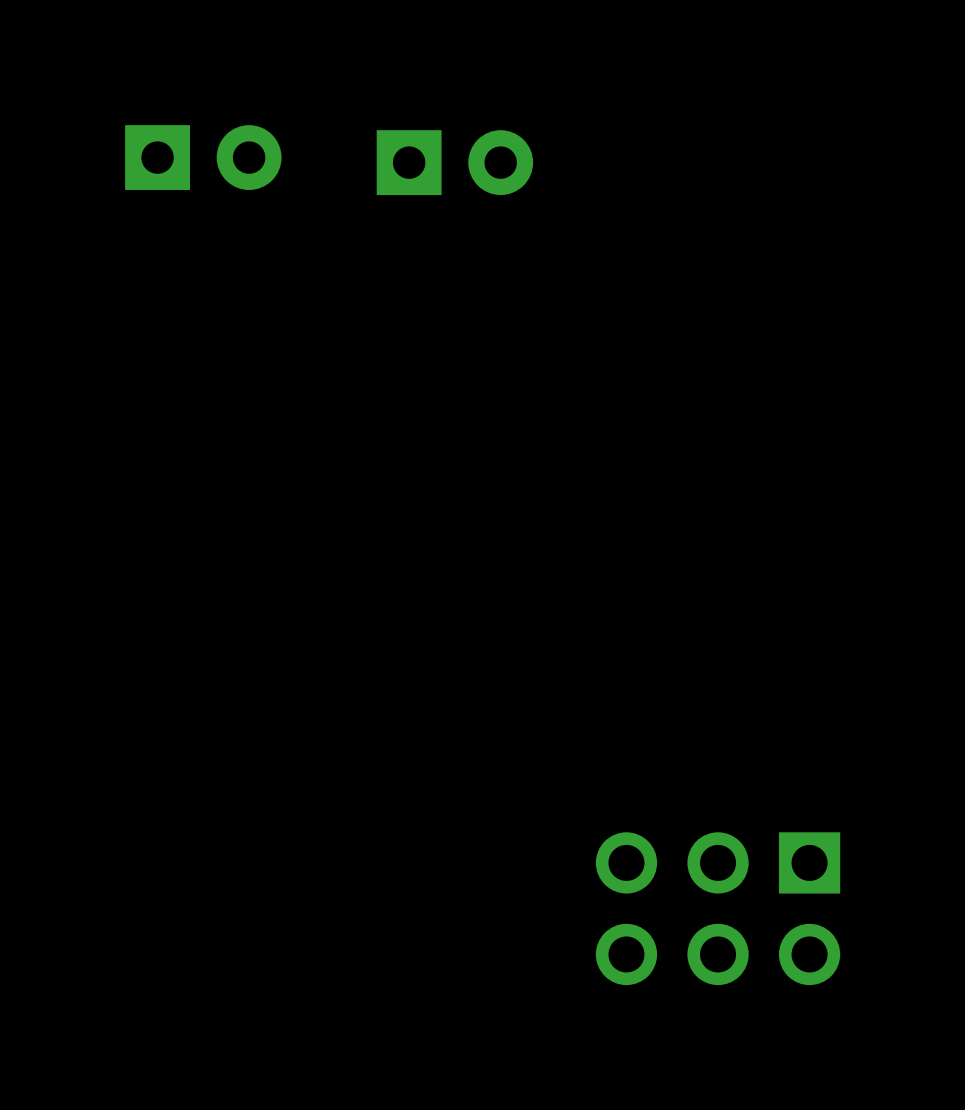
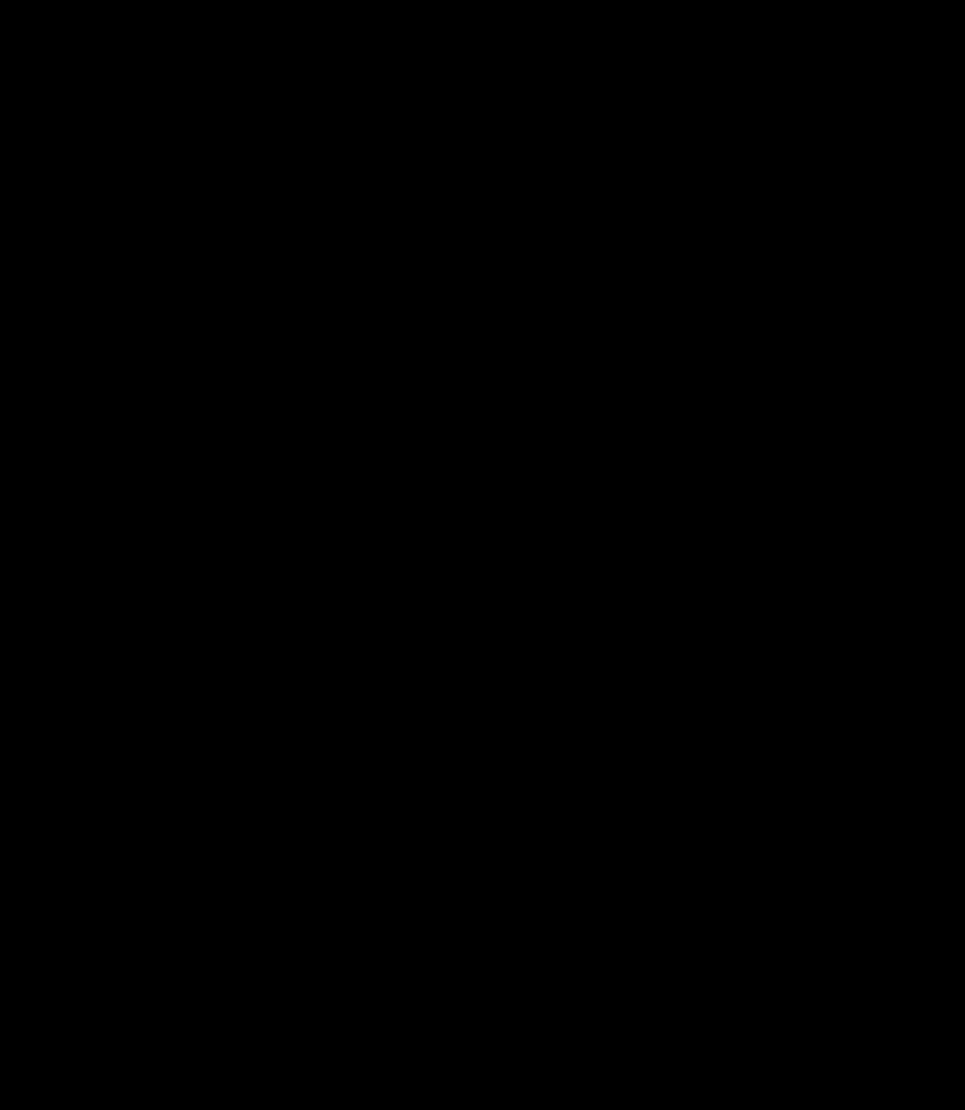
part: (203, 157) -> none
part: (454, 162) -> none
part: (718, 908) -> none

